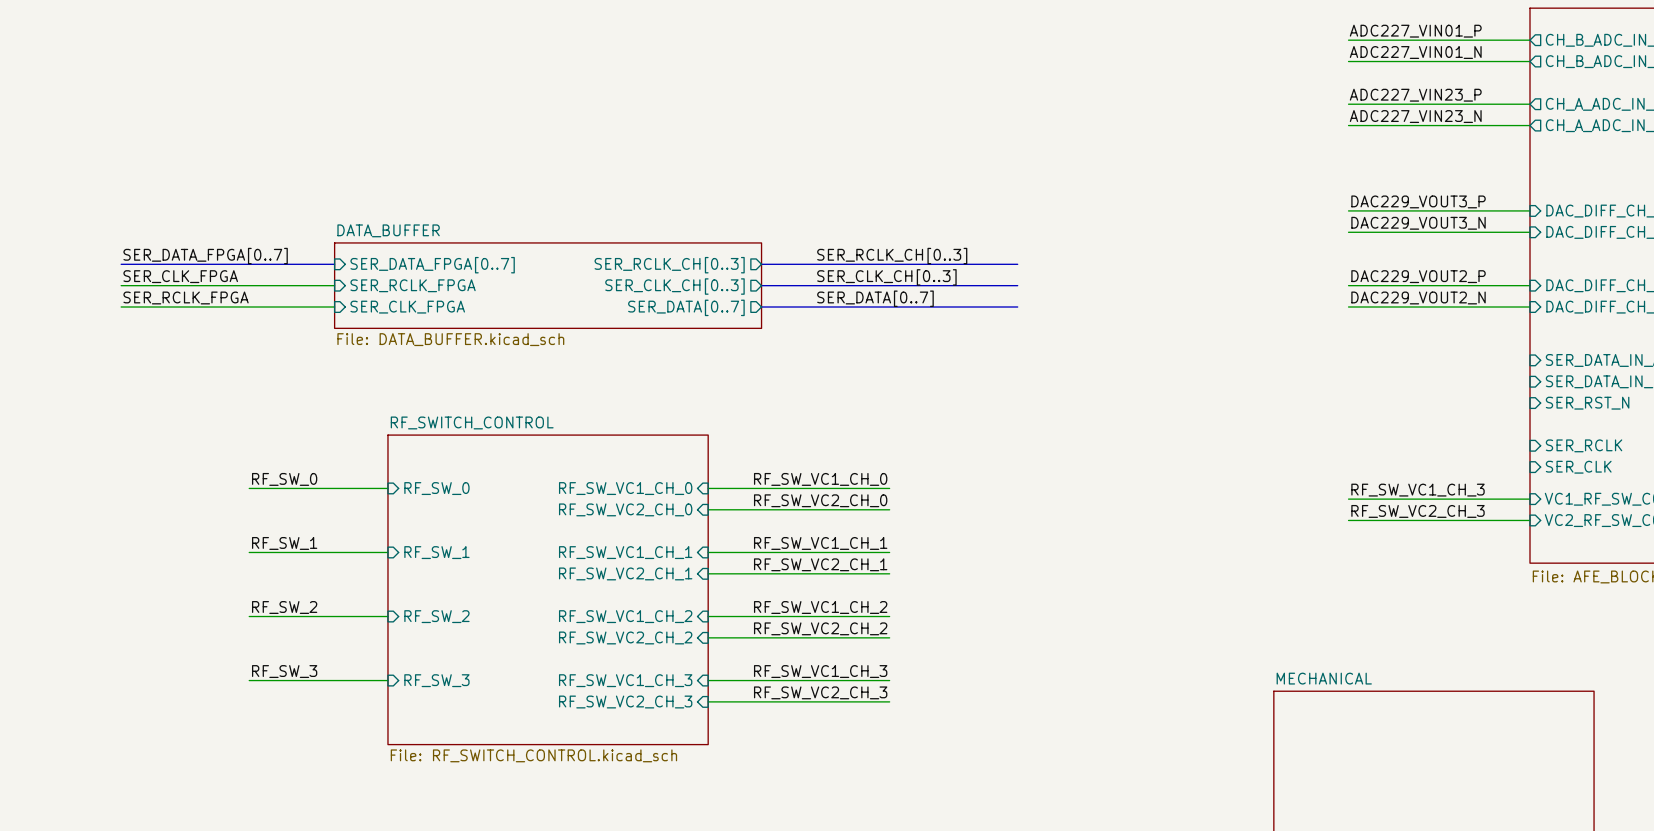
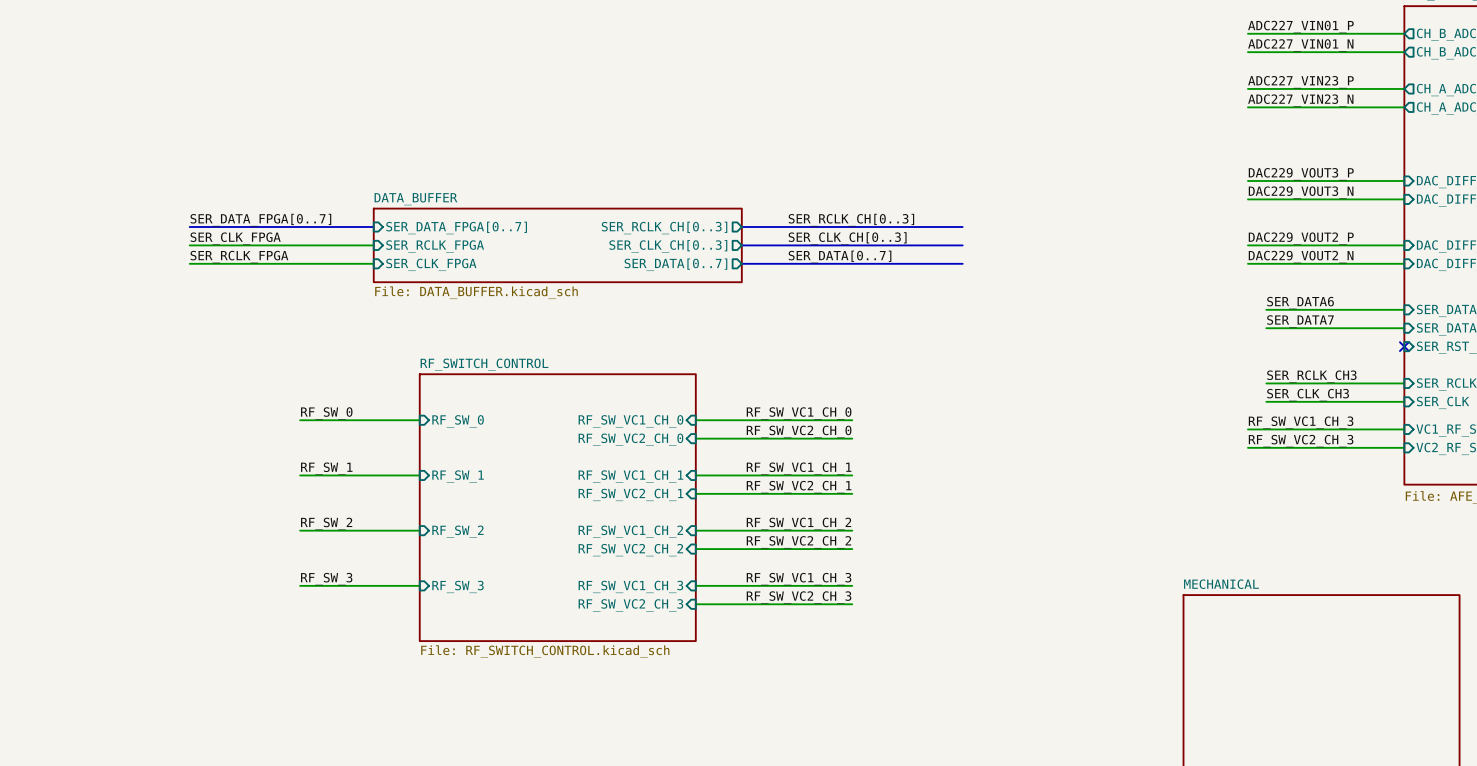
label: none -> SER_DATA6 (1300, 303)
wire: none -> (1266, 309) (1404, 309)
label: none -> SER_DATA7 (1300, 321)
wire: none -> (1266, 328) (1404, 328)
no-connect mark: none -> (1404, 346)
label: none -> SER_RCLK_CH3 (1311, 376)
wire: none -> (1266, 383) (1404, 383)
label: none -> SER_CLK_CH3 (1308, 395)
wire: none -> (1266, 401) (1404, 401)

